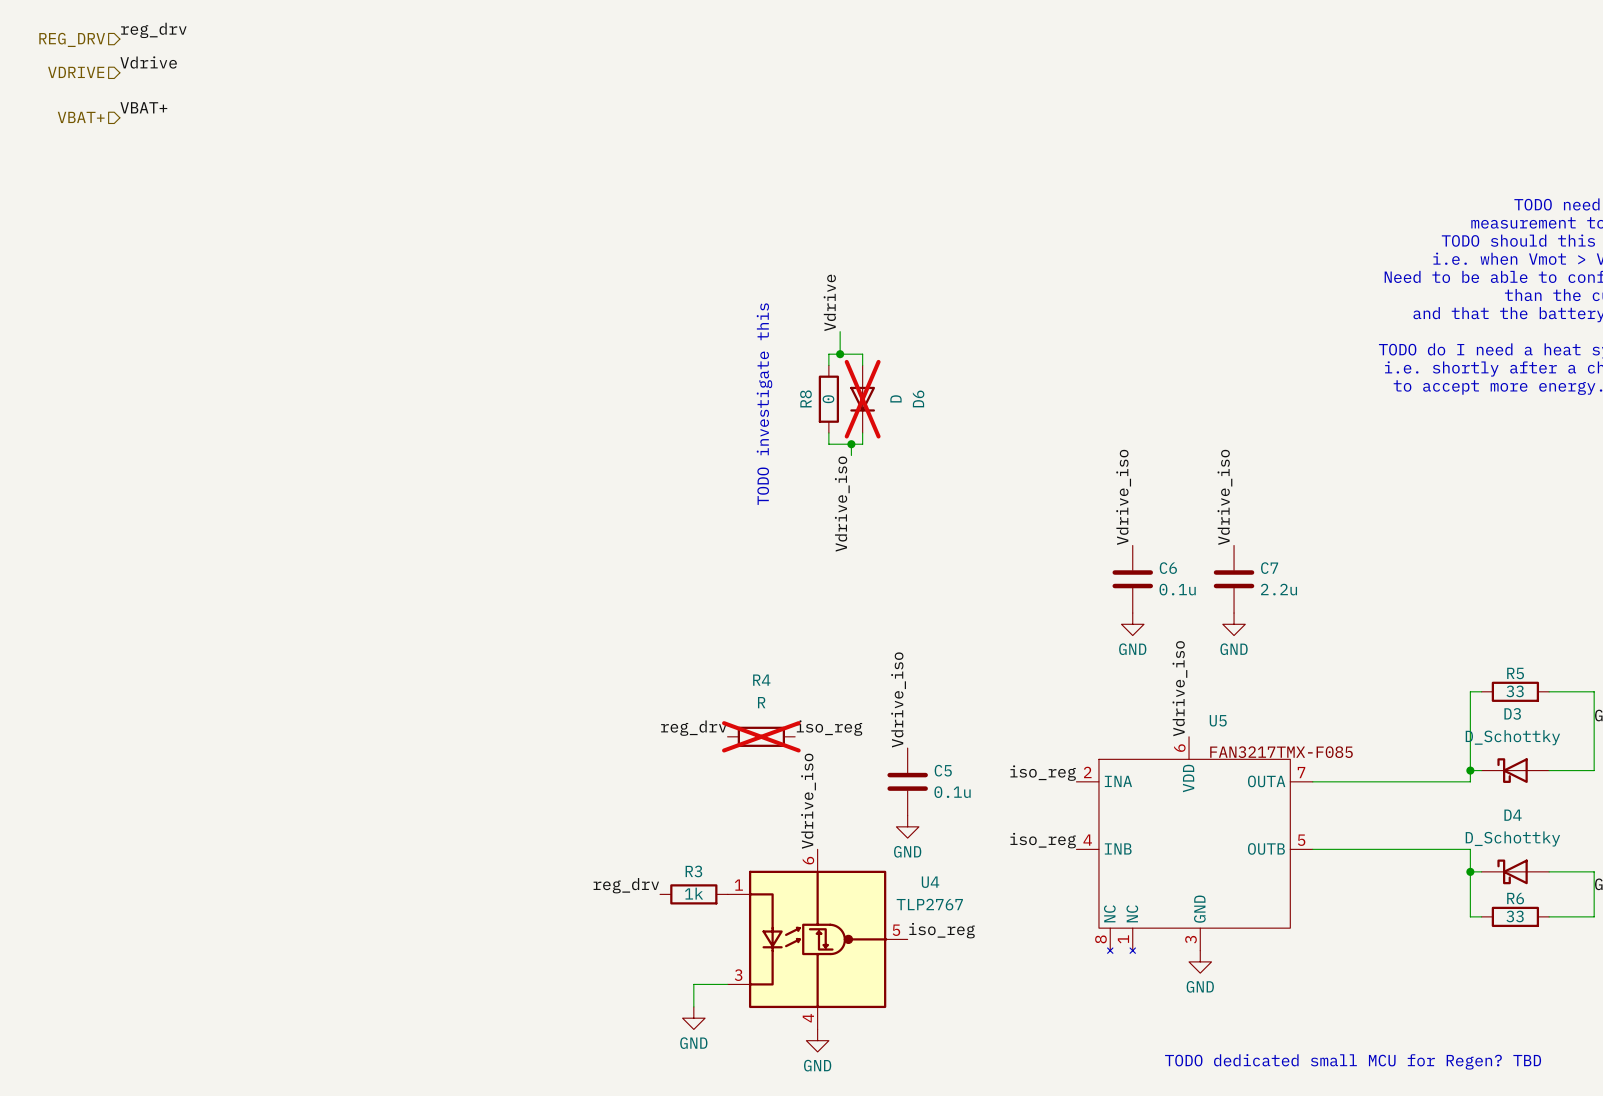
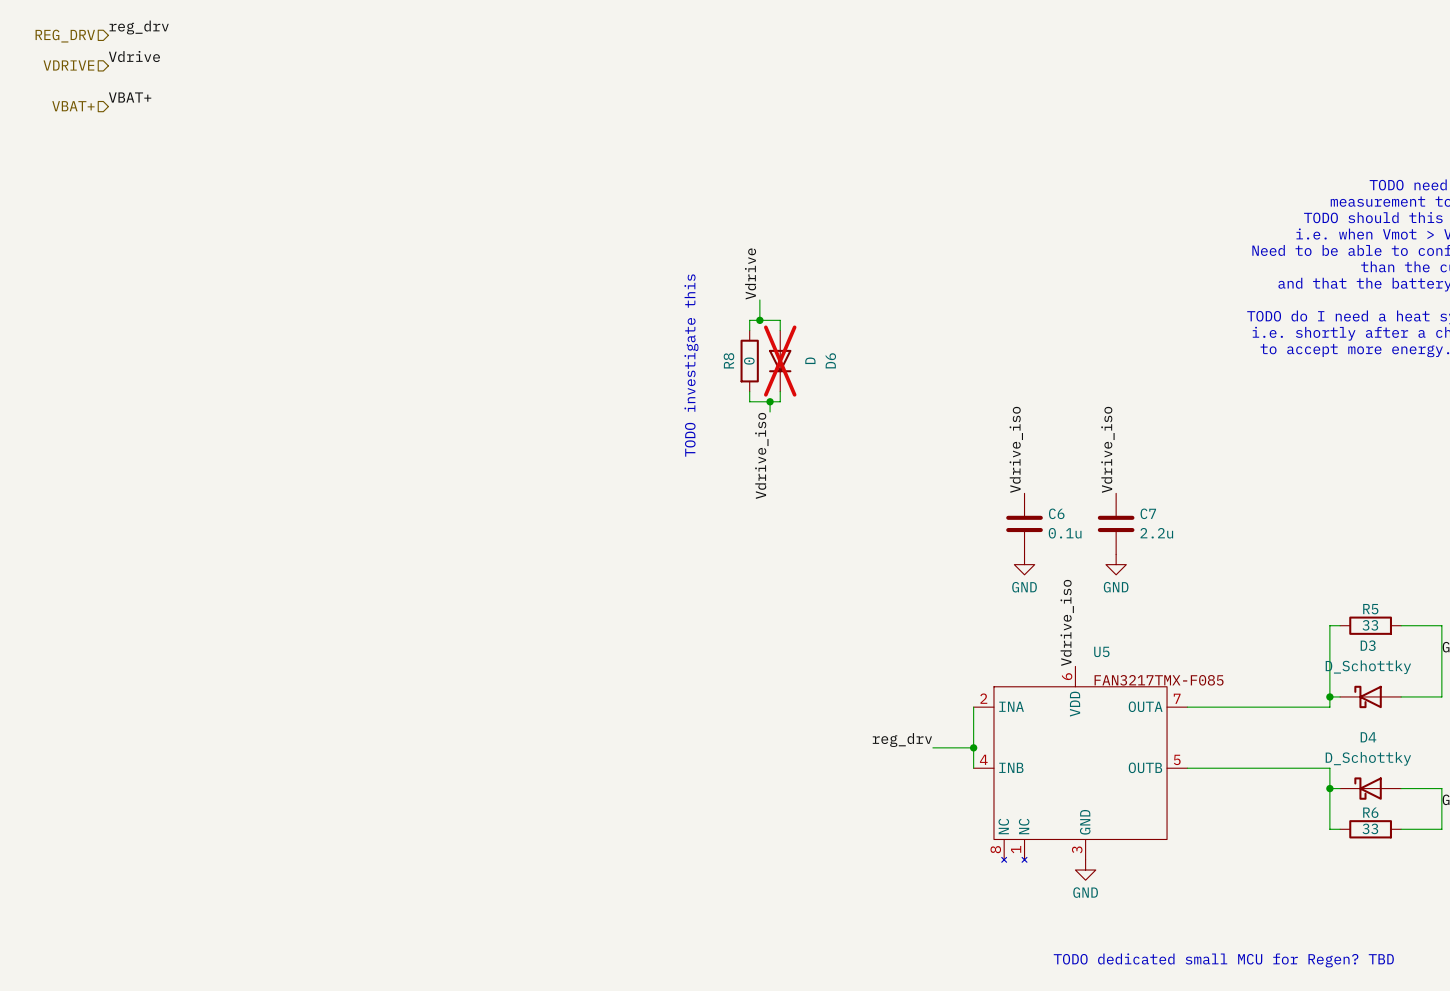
label: Vdrive_iso (898, 699) -> none
label: reg_drv (693, 728) -> none
label: iso_reg (829, 728) -> none
R4: R (761, 736) -> none
label: iso_reg (1043, 773) -> none
C5: 0.1u (907, 781) -> none
wire: none -> (973, 707) (973, 768)
label: Vdrive_iso (808, 801) -> none
label: none -> reg_drv (902, 740)
power symbol: GND (907, 826) -> none
wire: none -> (932, 747) (973, 747)
junction: none -> (973, 747)
label: iso_reg (1043, 840) -> none
label: reg_drv (626, 885) -> none
R3: 1k (693, 894) -> none
label: iso_reg (942, 930) -> none
U4: TLP2767 (817, 939) -> none
wire: (727, 984) (693, 984) (693, 1006) -> none
power symbol: GND (693, 1018) -> none
power symbol: GND (817, 1040) -> none

